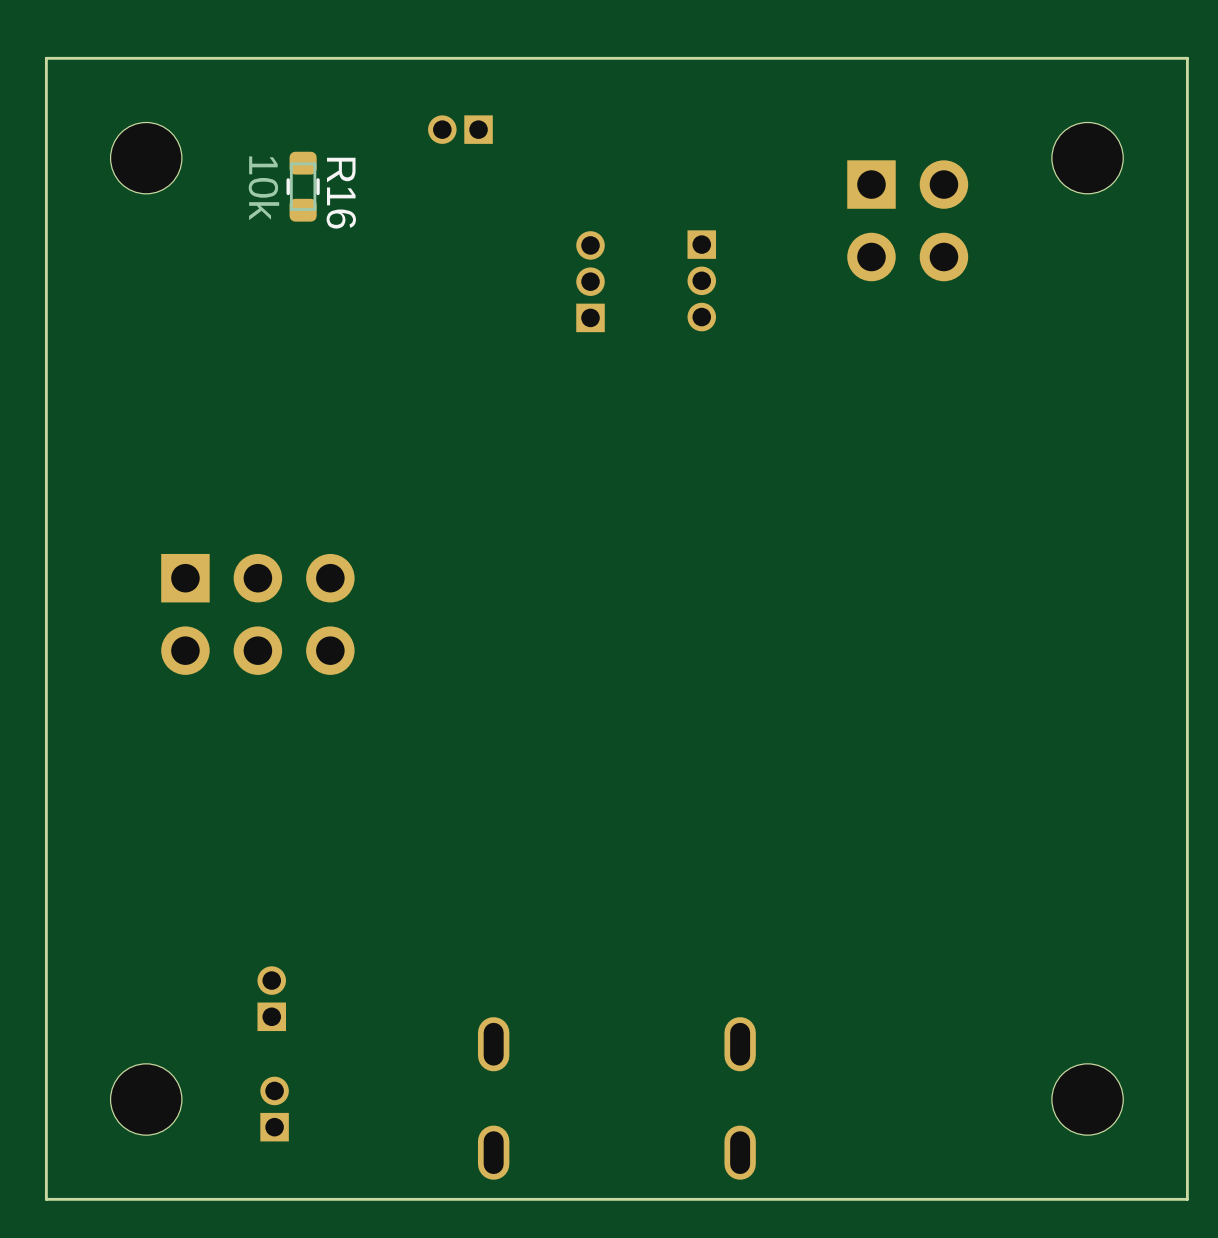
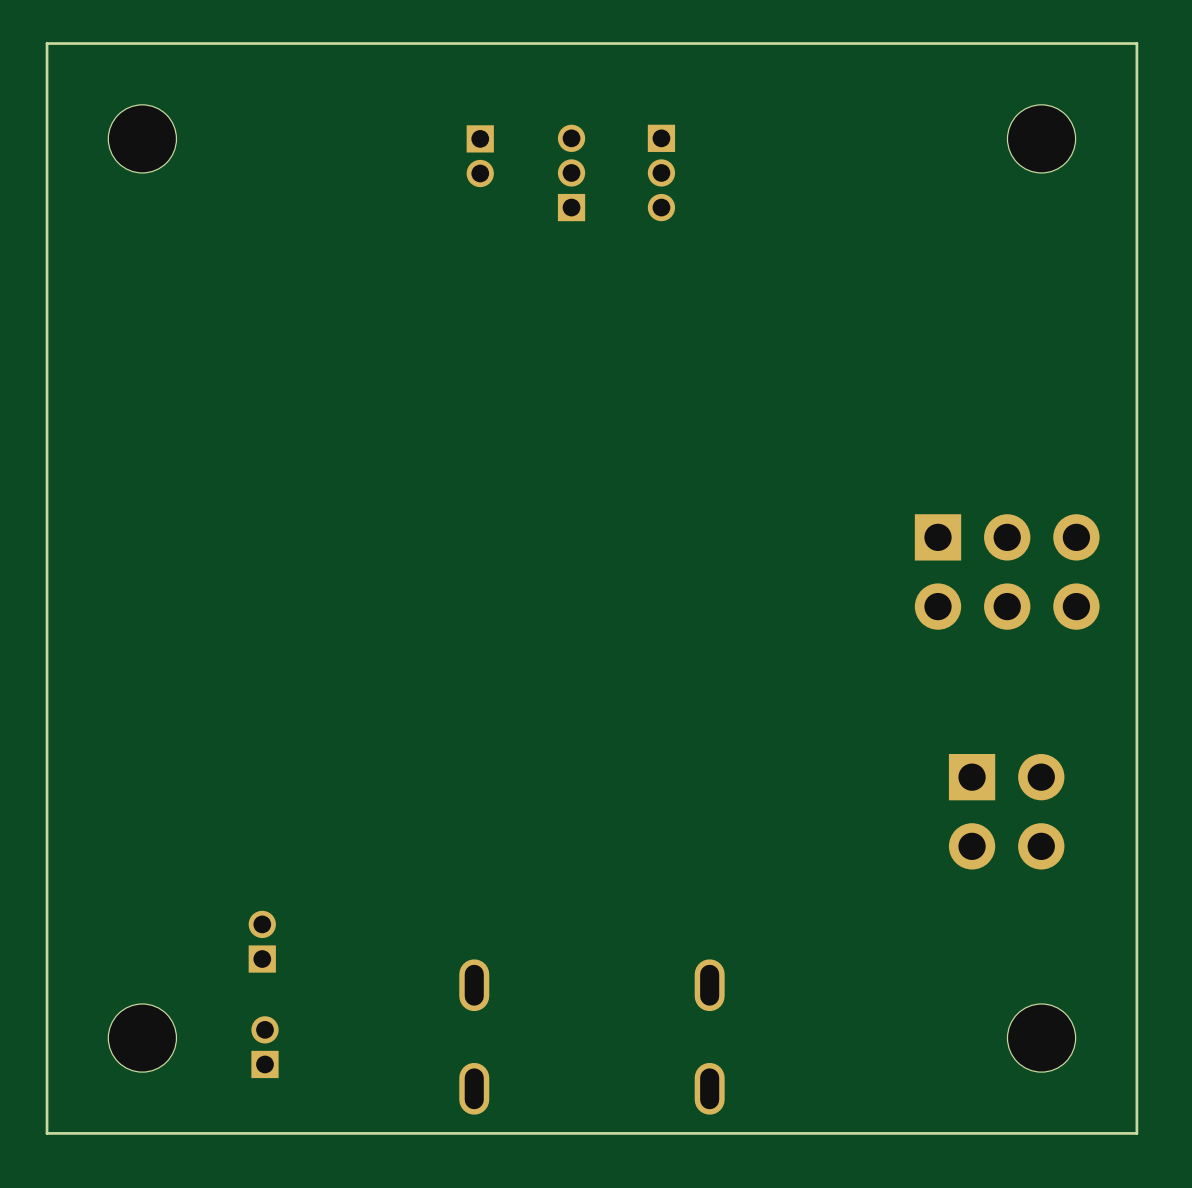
part rotation: 0° (460, 129) -> 90° counterclockwise (480, 156)
part position: (460, 129) -> (480, 156)
R16: 10k (303, 186) -> none
part: none -> (571, 172)
part: none -> (661, 172)
part position: (907, 220) -> (1006, 811)
part: (701, 280) -> none
part: (590, 281) -> none
part: none -> (1007, 571)
part: (257, 614) -> none

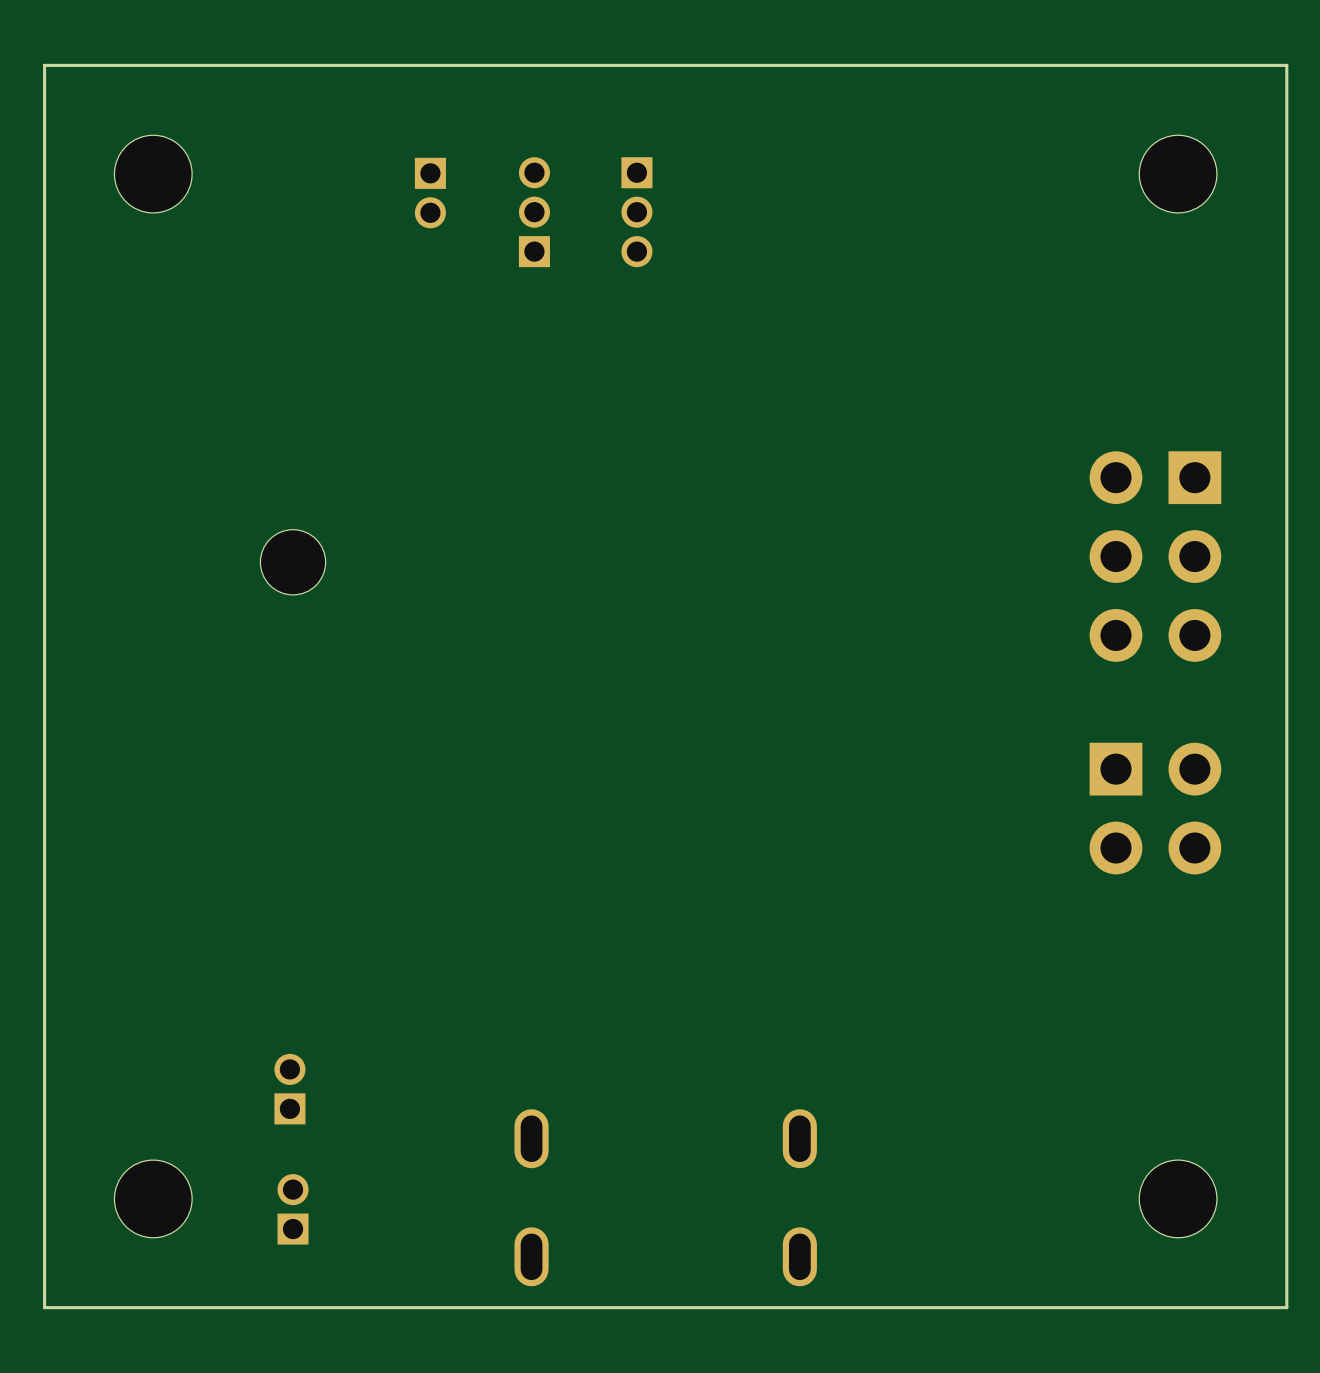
part footprint: [466, 125, 494, 188] -> [518, 157, 550, 268]
part: none -> (430, 193)
part rotation: 0° (571, 172) -> 180° (636, 212)
part: (661, 172) -> none
part: none -> (293, 562)
part rotation: 0° (1007, 571) -> 90° clockwise (1155, 556)
part position: (1006, 811) -> (1155, 808)

